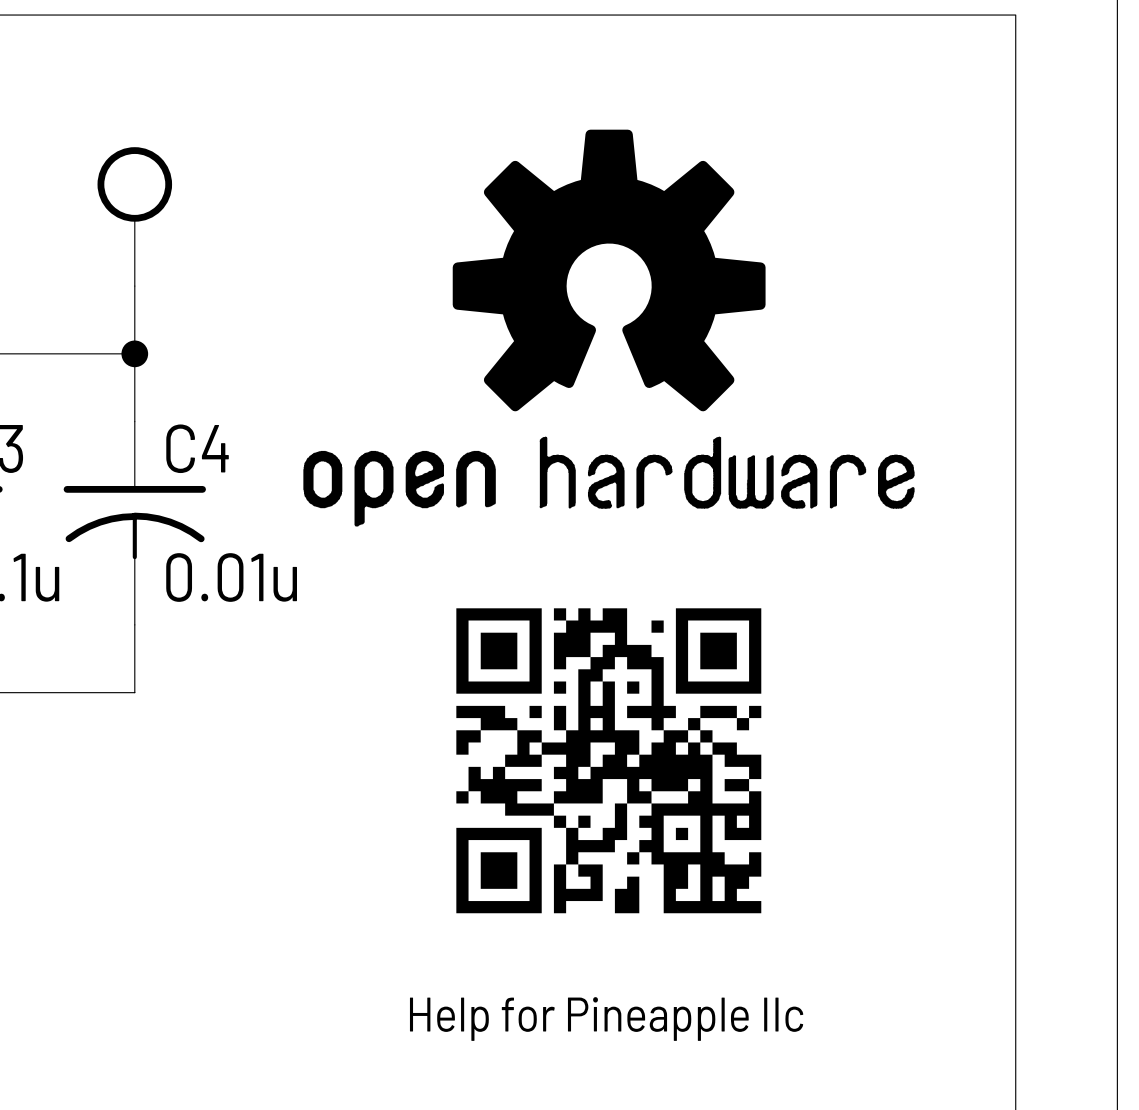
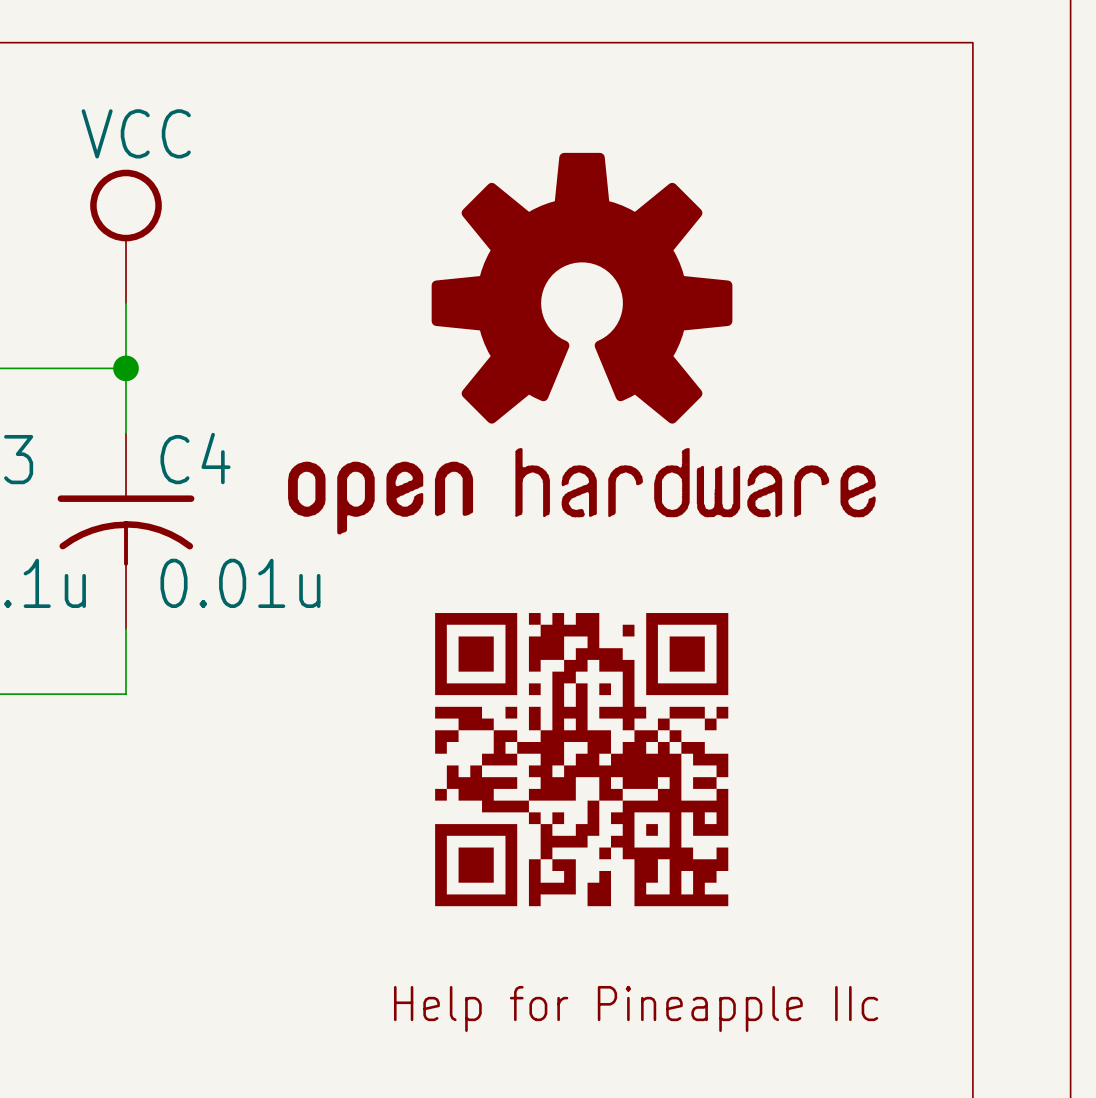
power symbol text: none -> VCC (136, 133)

